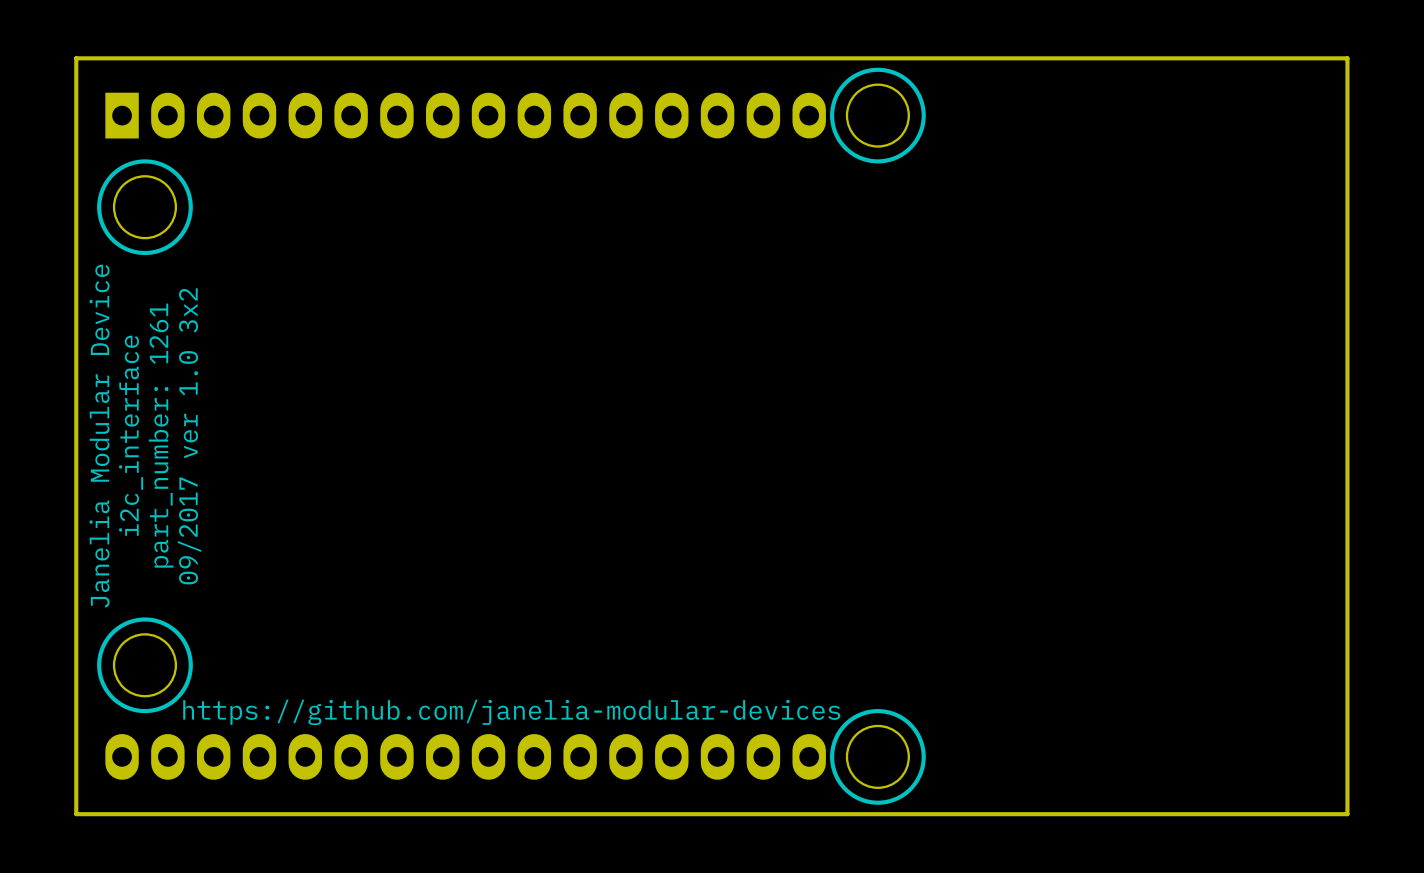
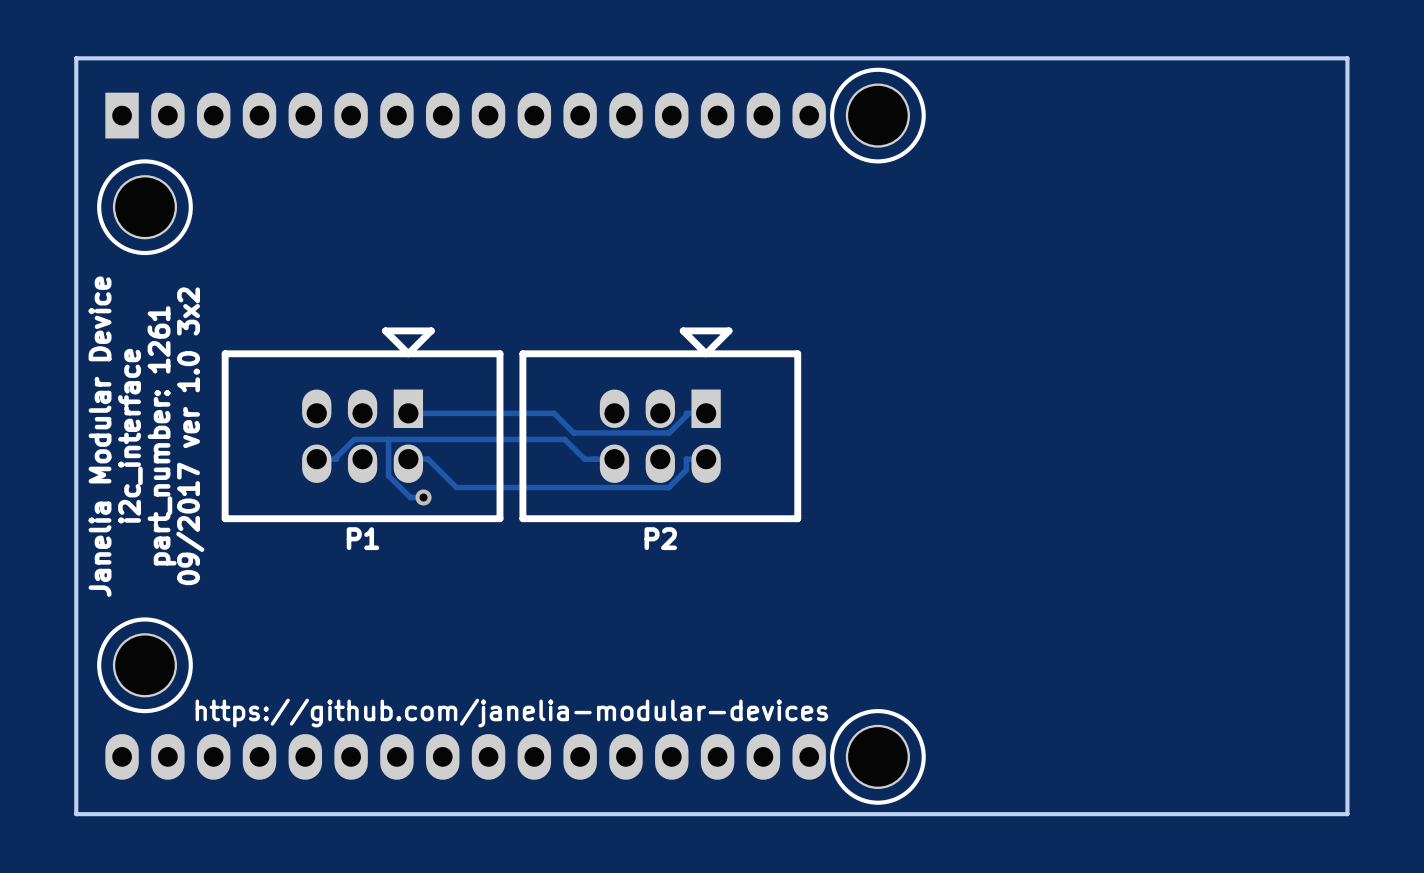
track: none -> (408, 413) (554, 413) (573, 433) (669, 433) (686, 415) (686, 413) (706, 413)
P1: none -> (362, 424)
P2: none -> (660, 424)
track: none -> (388, 439) (388, 475) (410, 497) (423, 497)
track: none -> (316, 459) (336, 459) (354, 439) (564, 439) (584, 459) (614, 459)
track: none -> (408, 459) (428, 459) (456, 487) (668, 487) (686, 469) (686, 459) (706, 459)
via: none -> (423, 497)

